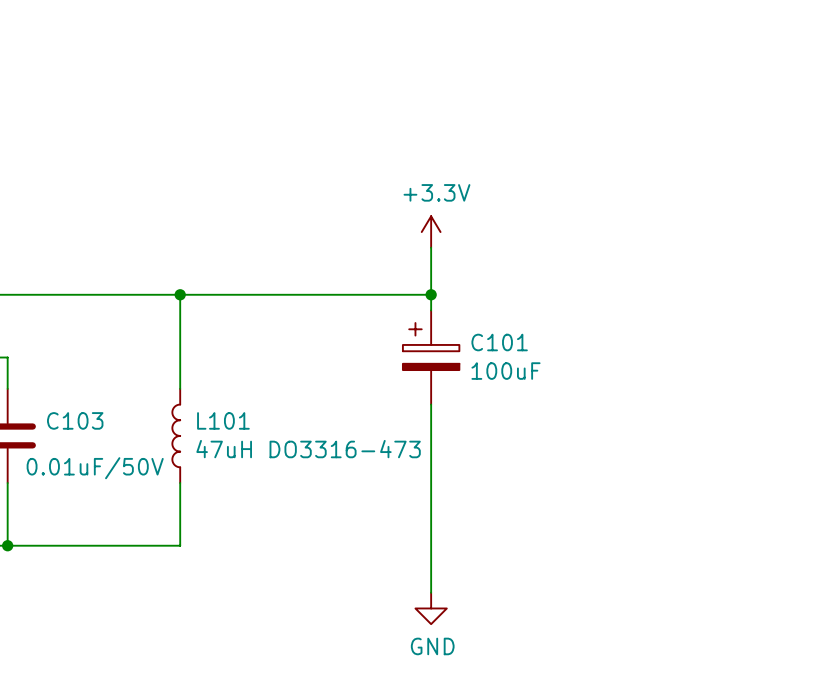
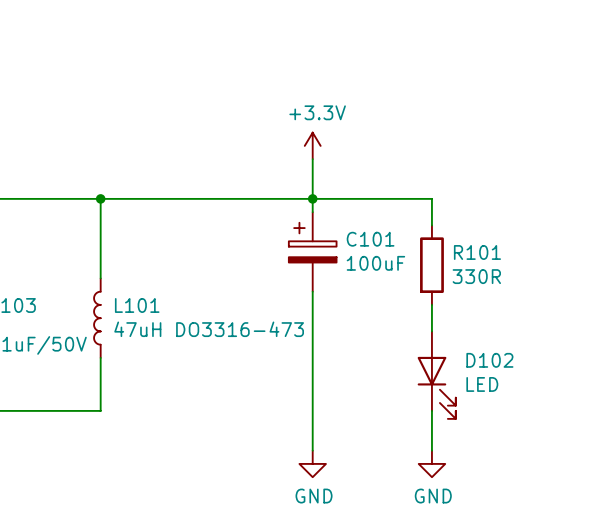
wire: none -> (312, 198) (431, 198) (431, 225)
R101: none -> 330R (431, 265)
wire: none -> (431, 304) (431, 331)
D102: none -> LED (436, 375)
wire: none -> (431, 410) (431, 450)
power symbol: none -> GND (431, 463)

